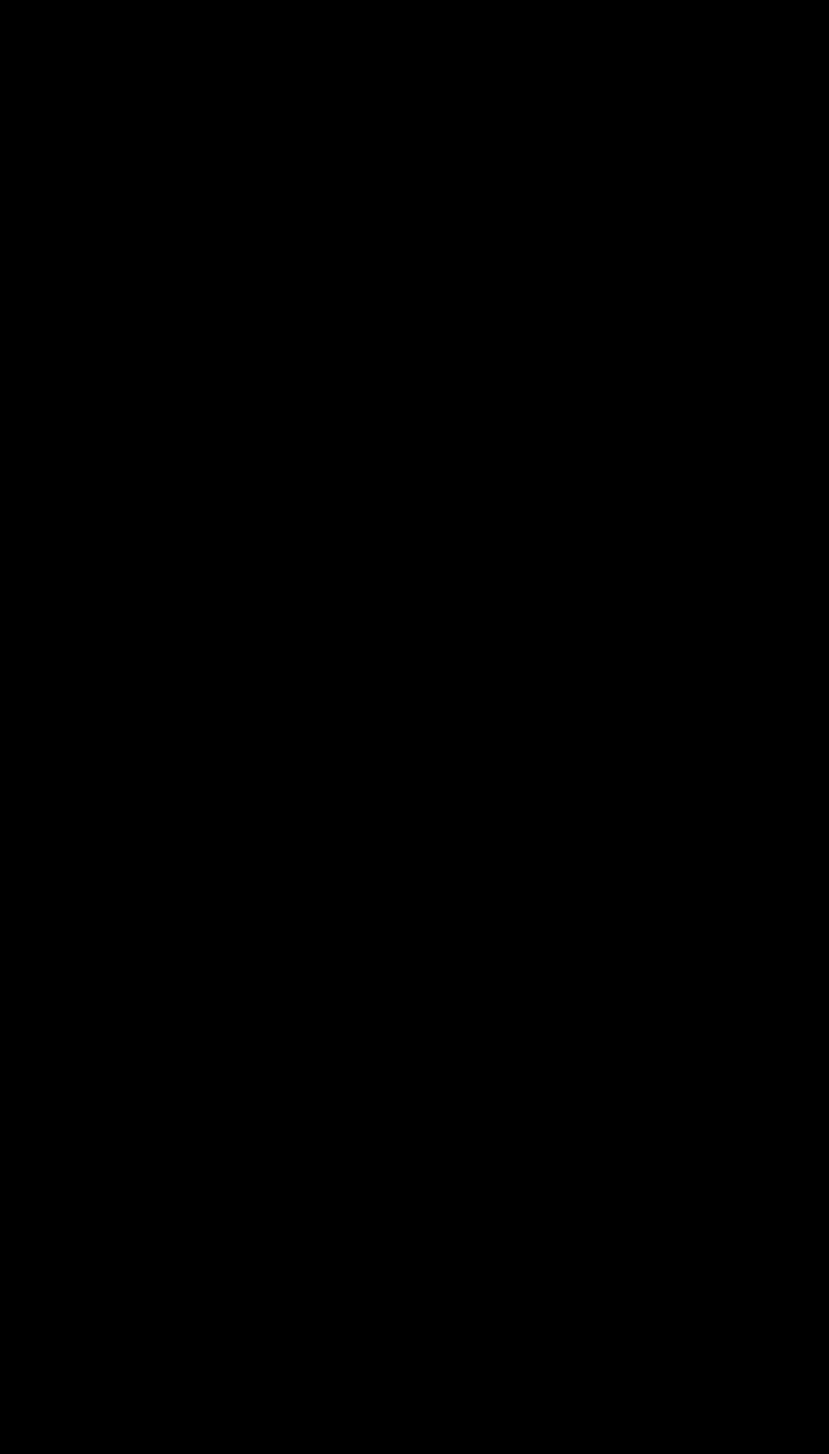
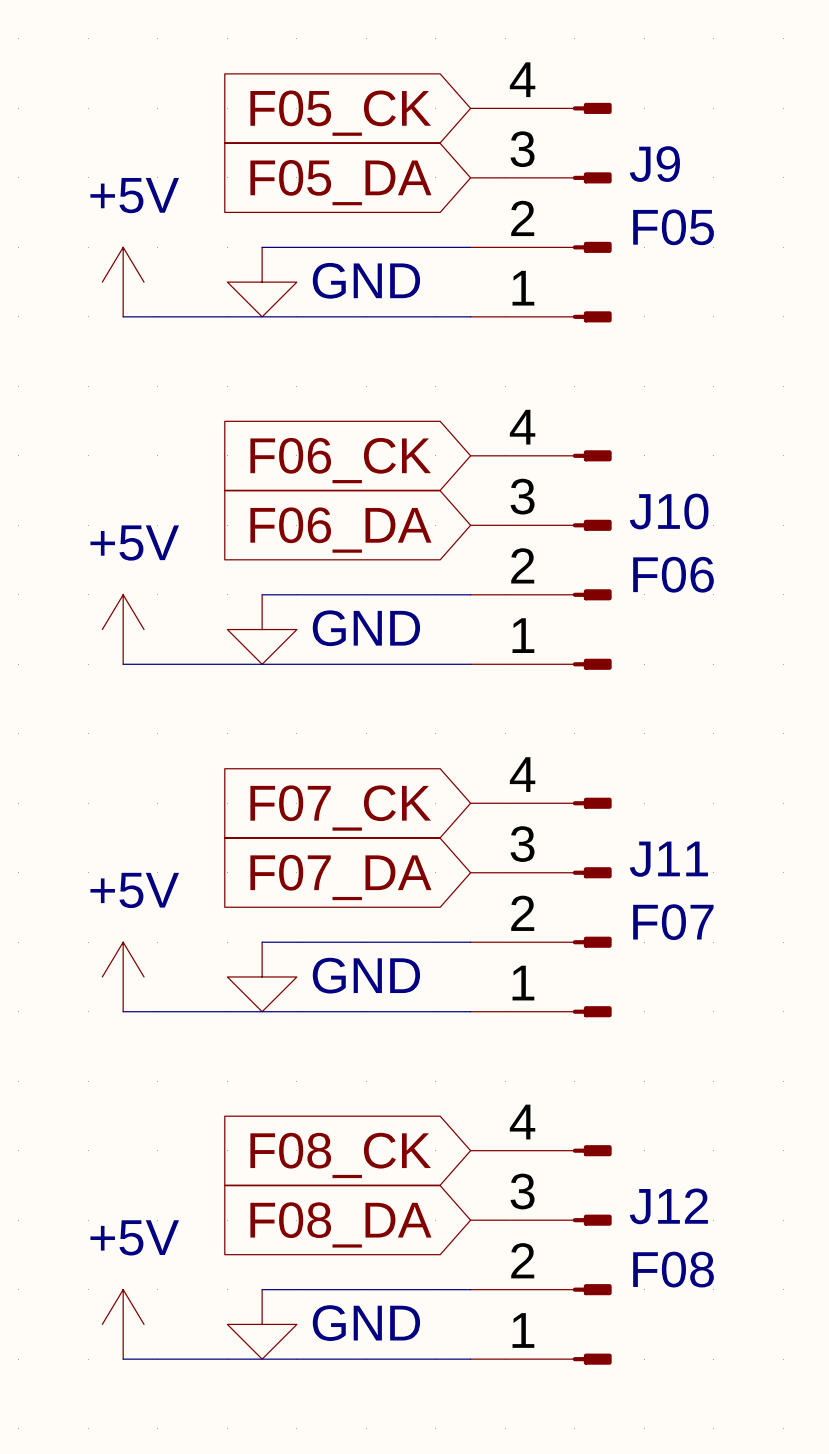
global label: none -> F05_CK (340, 113)
global label: none -> F05_DA (340, 182)
J9: none -> F05 (541, 212)
wire: none -> (262, 247) (470, 247)
power symbol: none -> +5V (123, 282)
power symbol: none -> GND (262, 282)
wire: none -> (123, 316) (470, 316)
global label: none -> F06_CK (340, 460)
global label: none -> F06_DA (340, 530)
J10: none -> F06 (541, 560)
wire: none -> (262, 594) (470, 594)
power symbol: none -> +5V (123, 629)
power symbol: none -> GND (262, 629)
wire: none -> (123, 664) (470, 664)
global label: none -> F07_CK (340, 808)
global label: none -> F07_DA (340, 877)
J11: none -> F07 (541, 907)
wire: none -> (262, 942) (470, 942)
power symbol: none -> +5V (123, 976)
power symbol: none -> GND (262, 976)
wire: none -> (123, 1011) (470, 1011)
global label: none -> F08_CK (340, 1155)
global label: none -> F08_DA (340, 1224)
J12: none -> F08 (541, 1254)
wire: none -> (262, 1289) (470, 1289)
power symbol: none -> +5V (123, 1324)
power symbol: none -> GND (262, 1324)
wire: none -> (123, 1359) (470, 1359)

